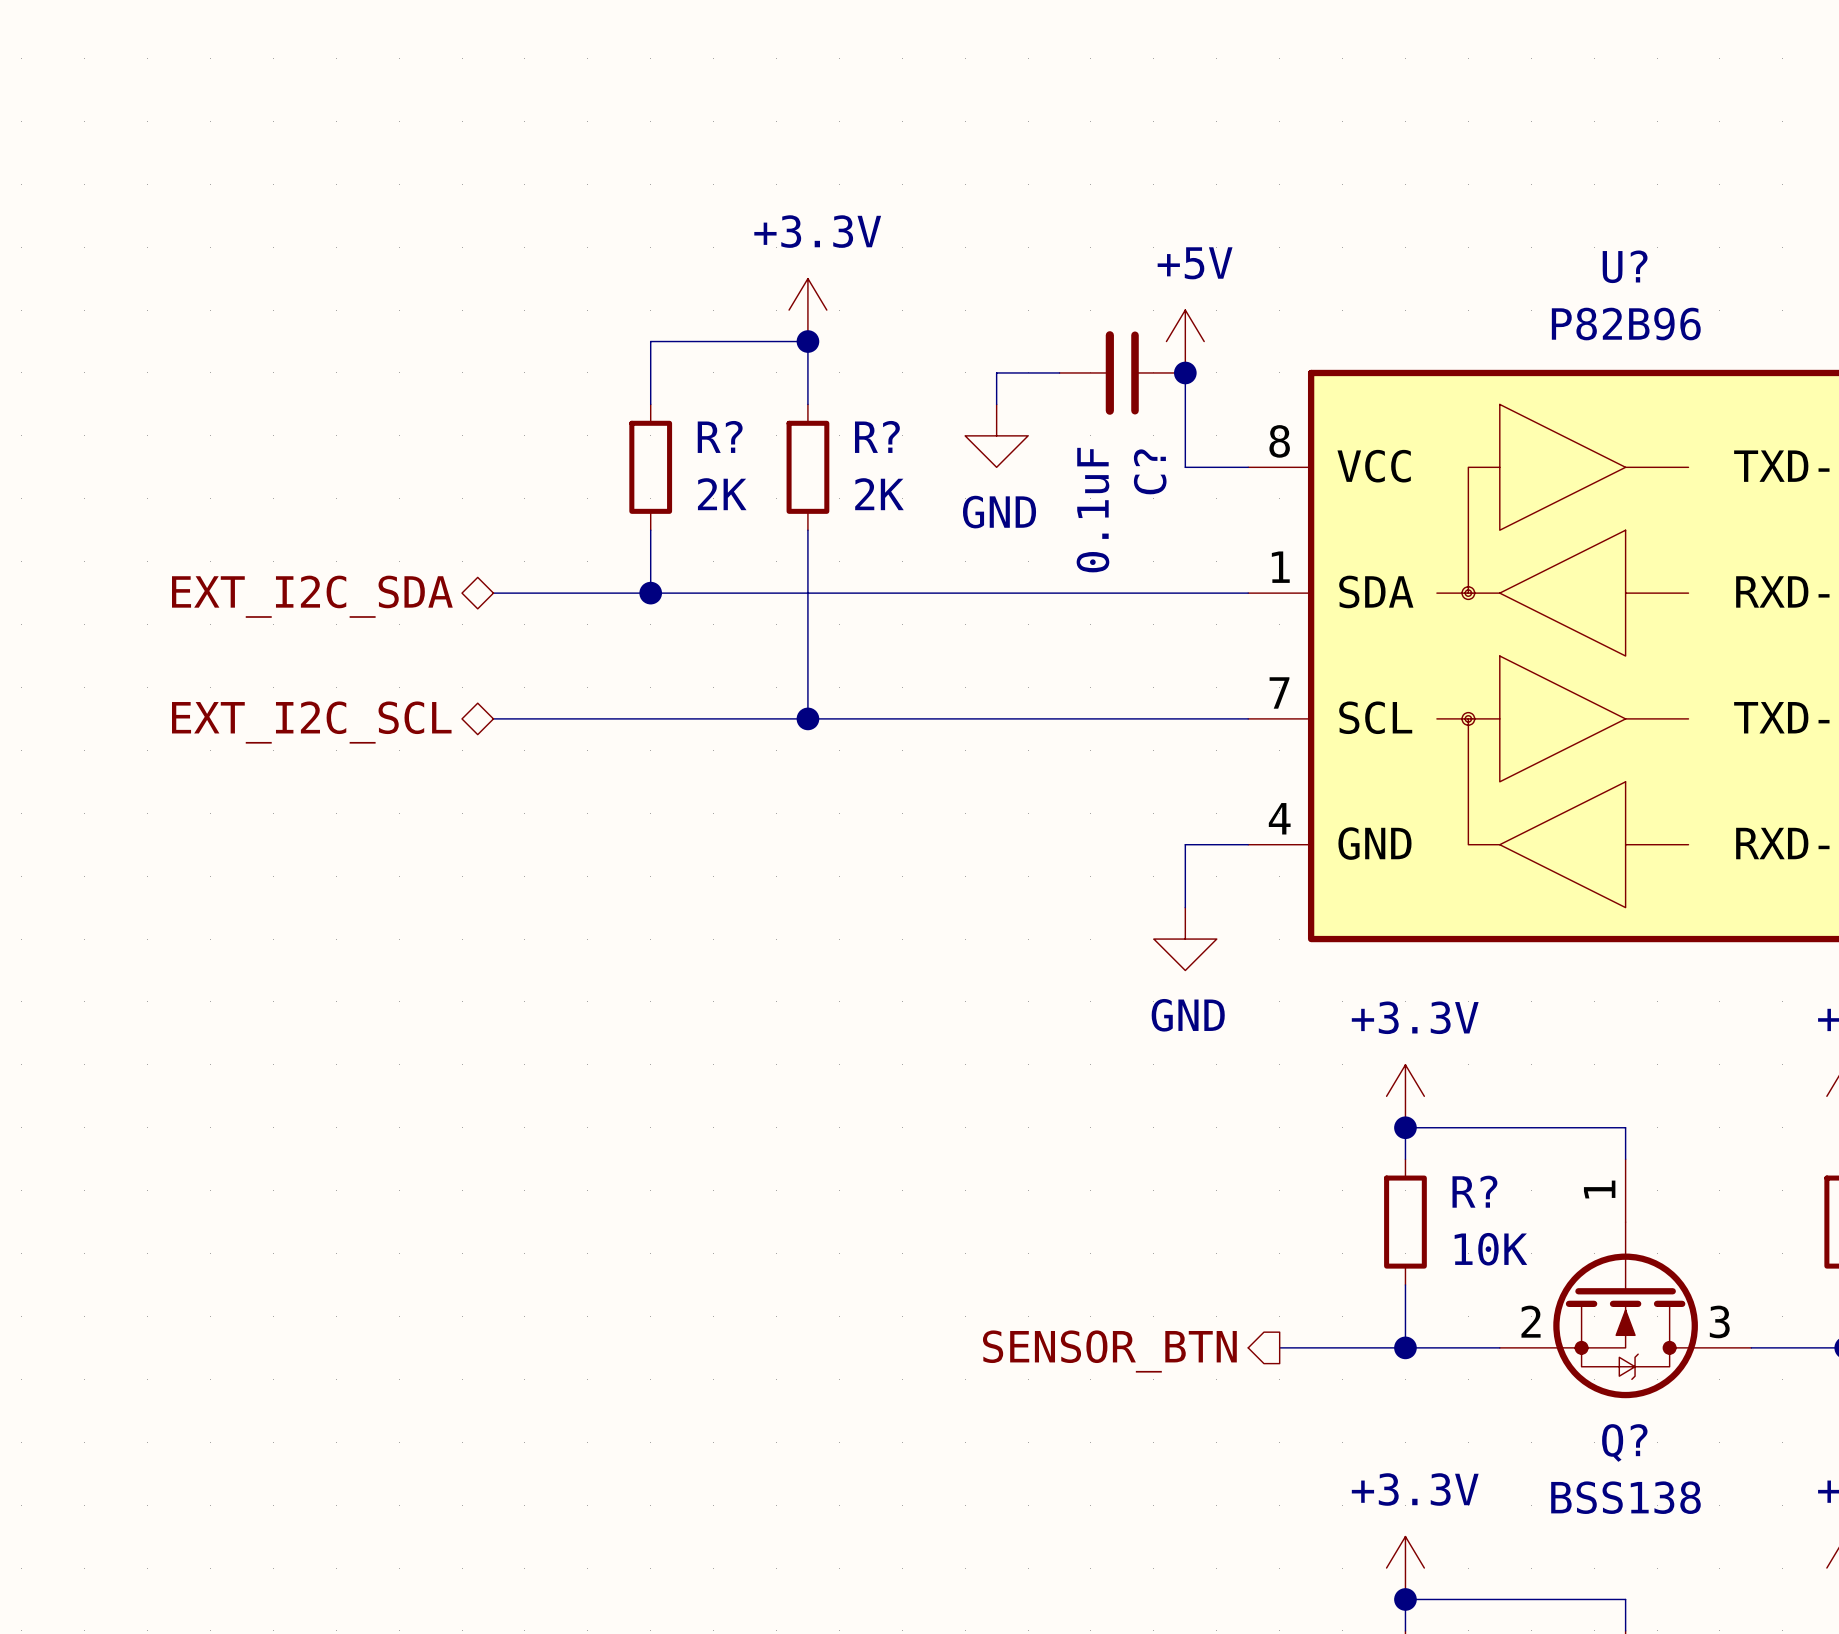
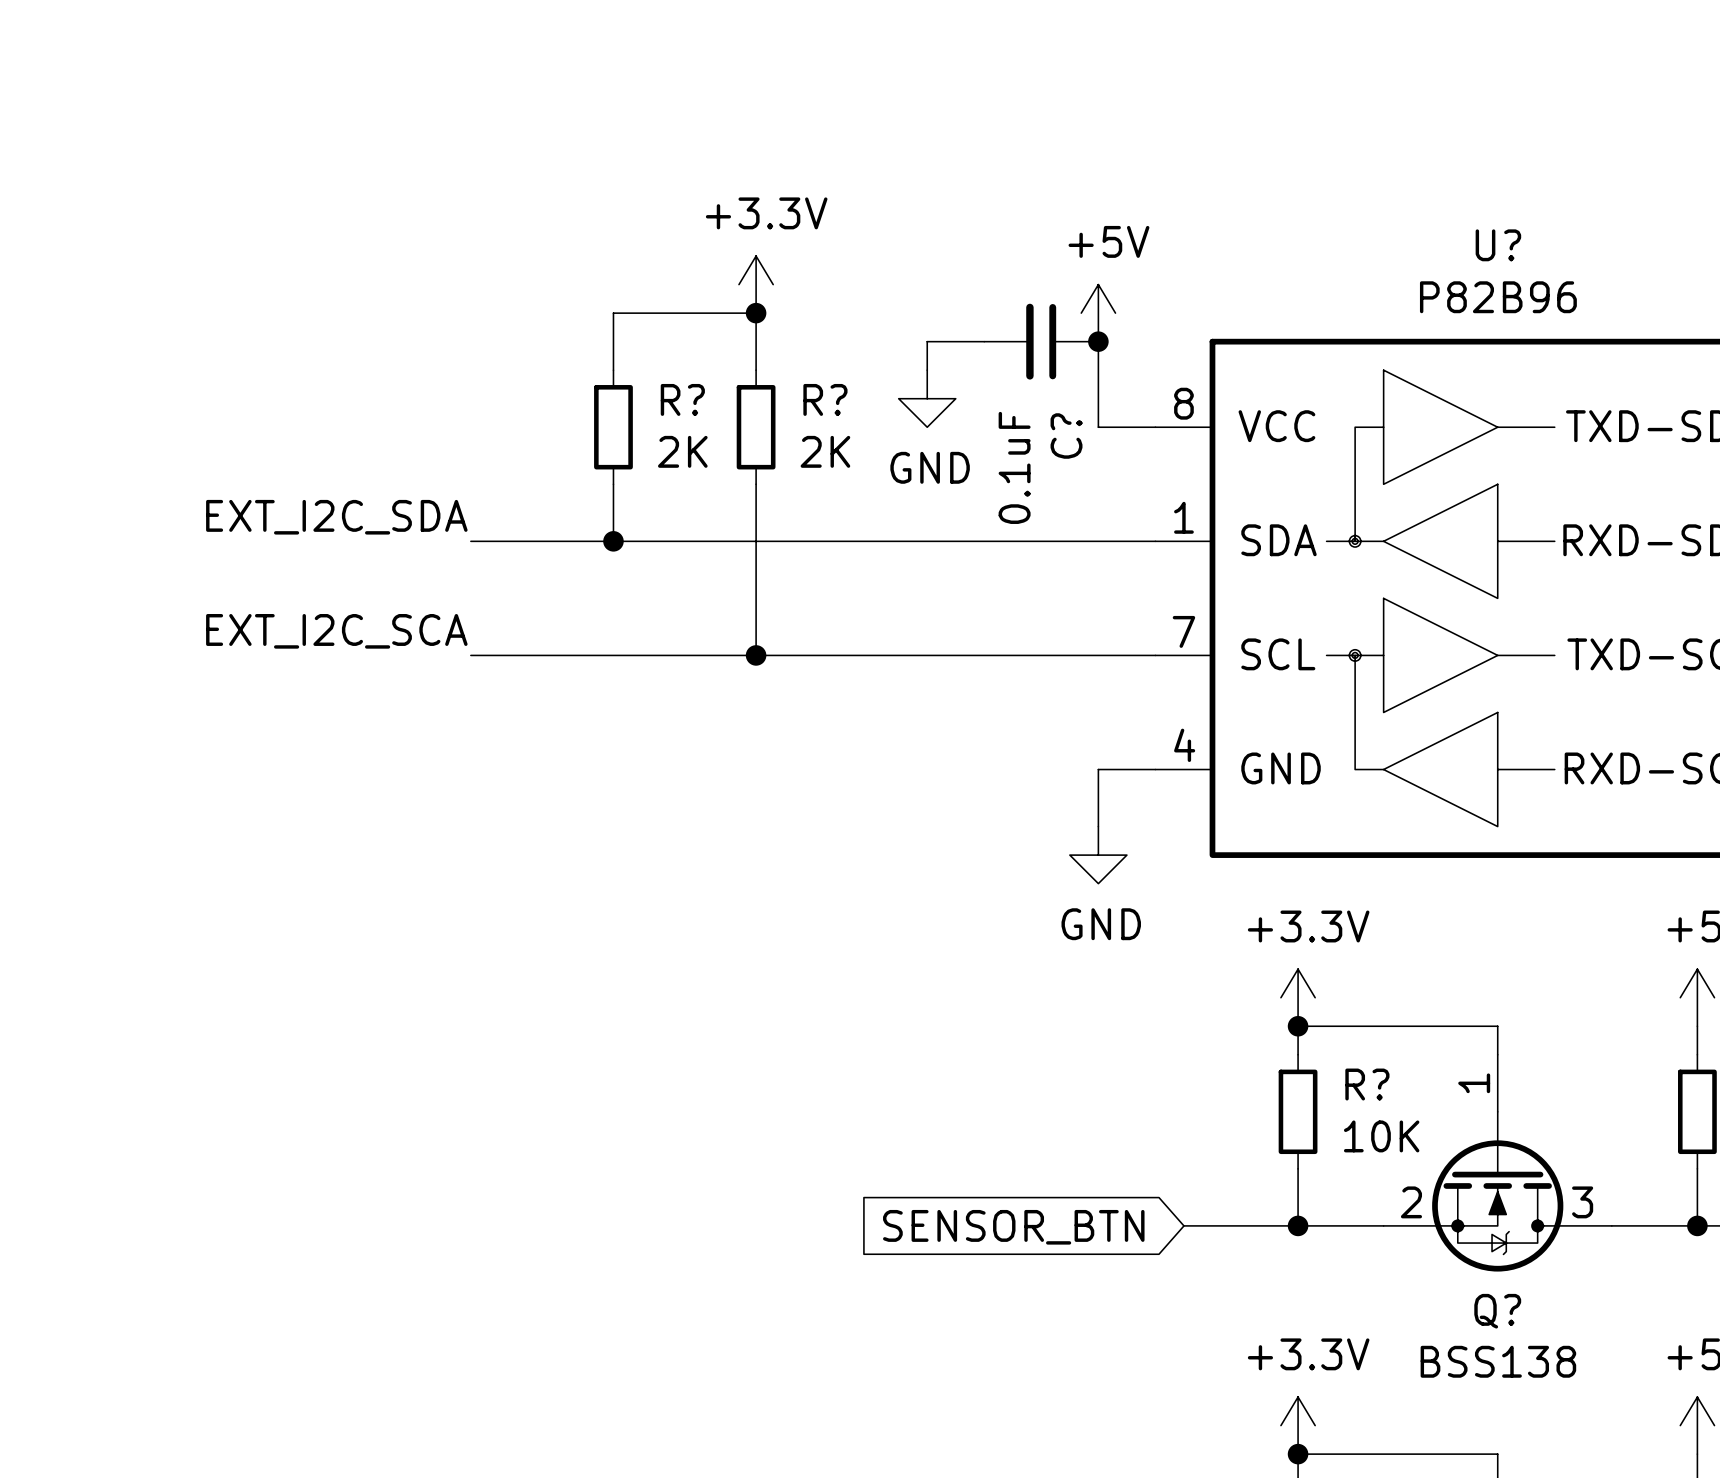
label: none -> EXT_I2C_SDA (336, 517)
hierarchical label: EXT_I2C_SDA (312, 596) -> none
label: none -> EXT_I2C_SCA (336, 631)
hierarchical label: EXT_I2C_SCL (311, 722) -> none
hierarchical label: SENSOR_BTN (1109, 1351) -> none
global label: none -> SENSOR_BTN (1013, 1227)

